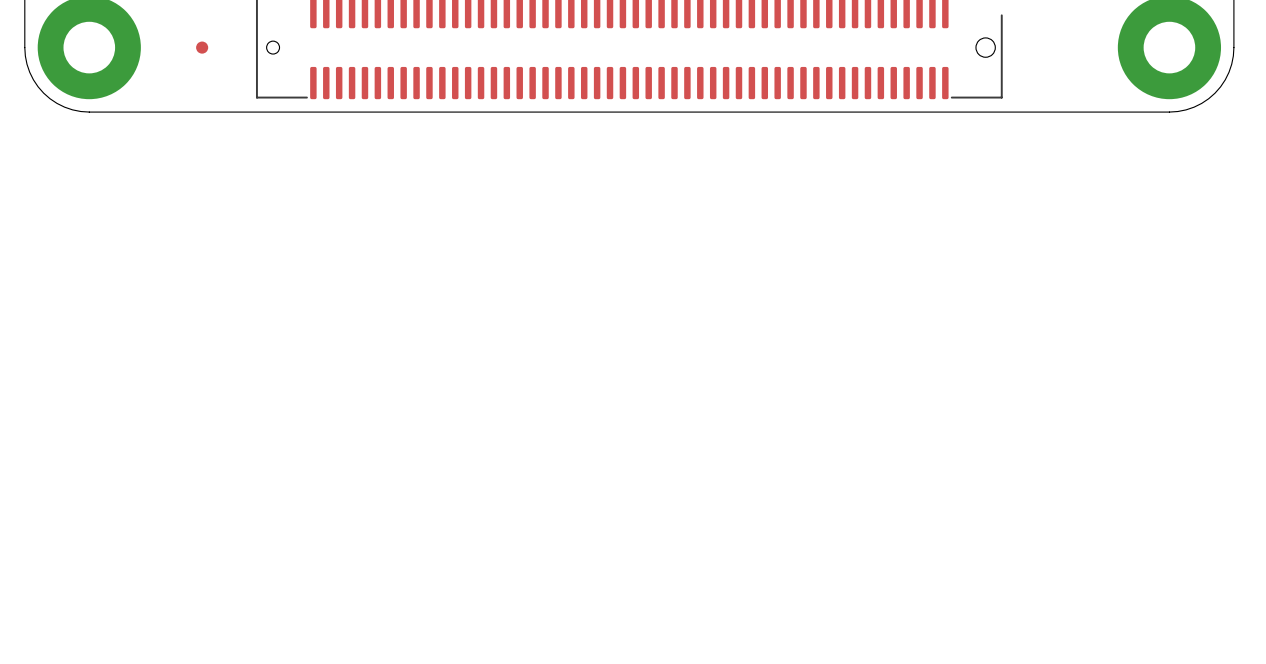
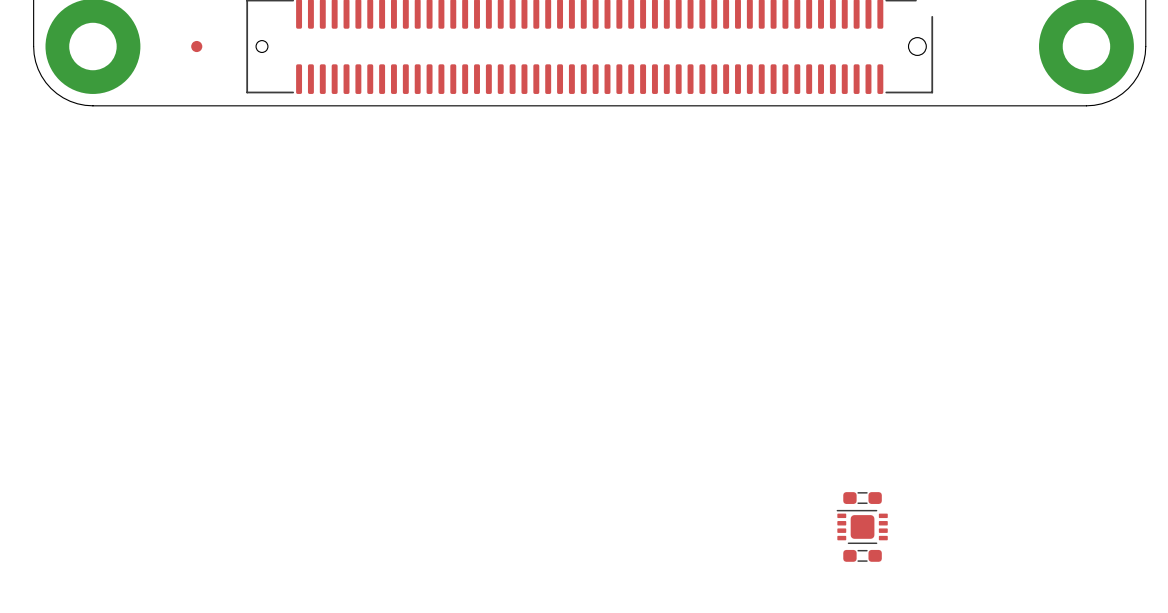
part: none -> (862, 498)
part: none -> (862, 526)
part: none -> (862, 555)

